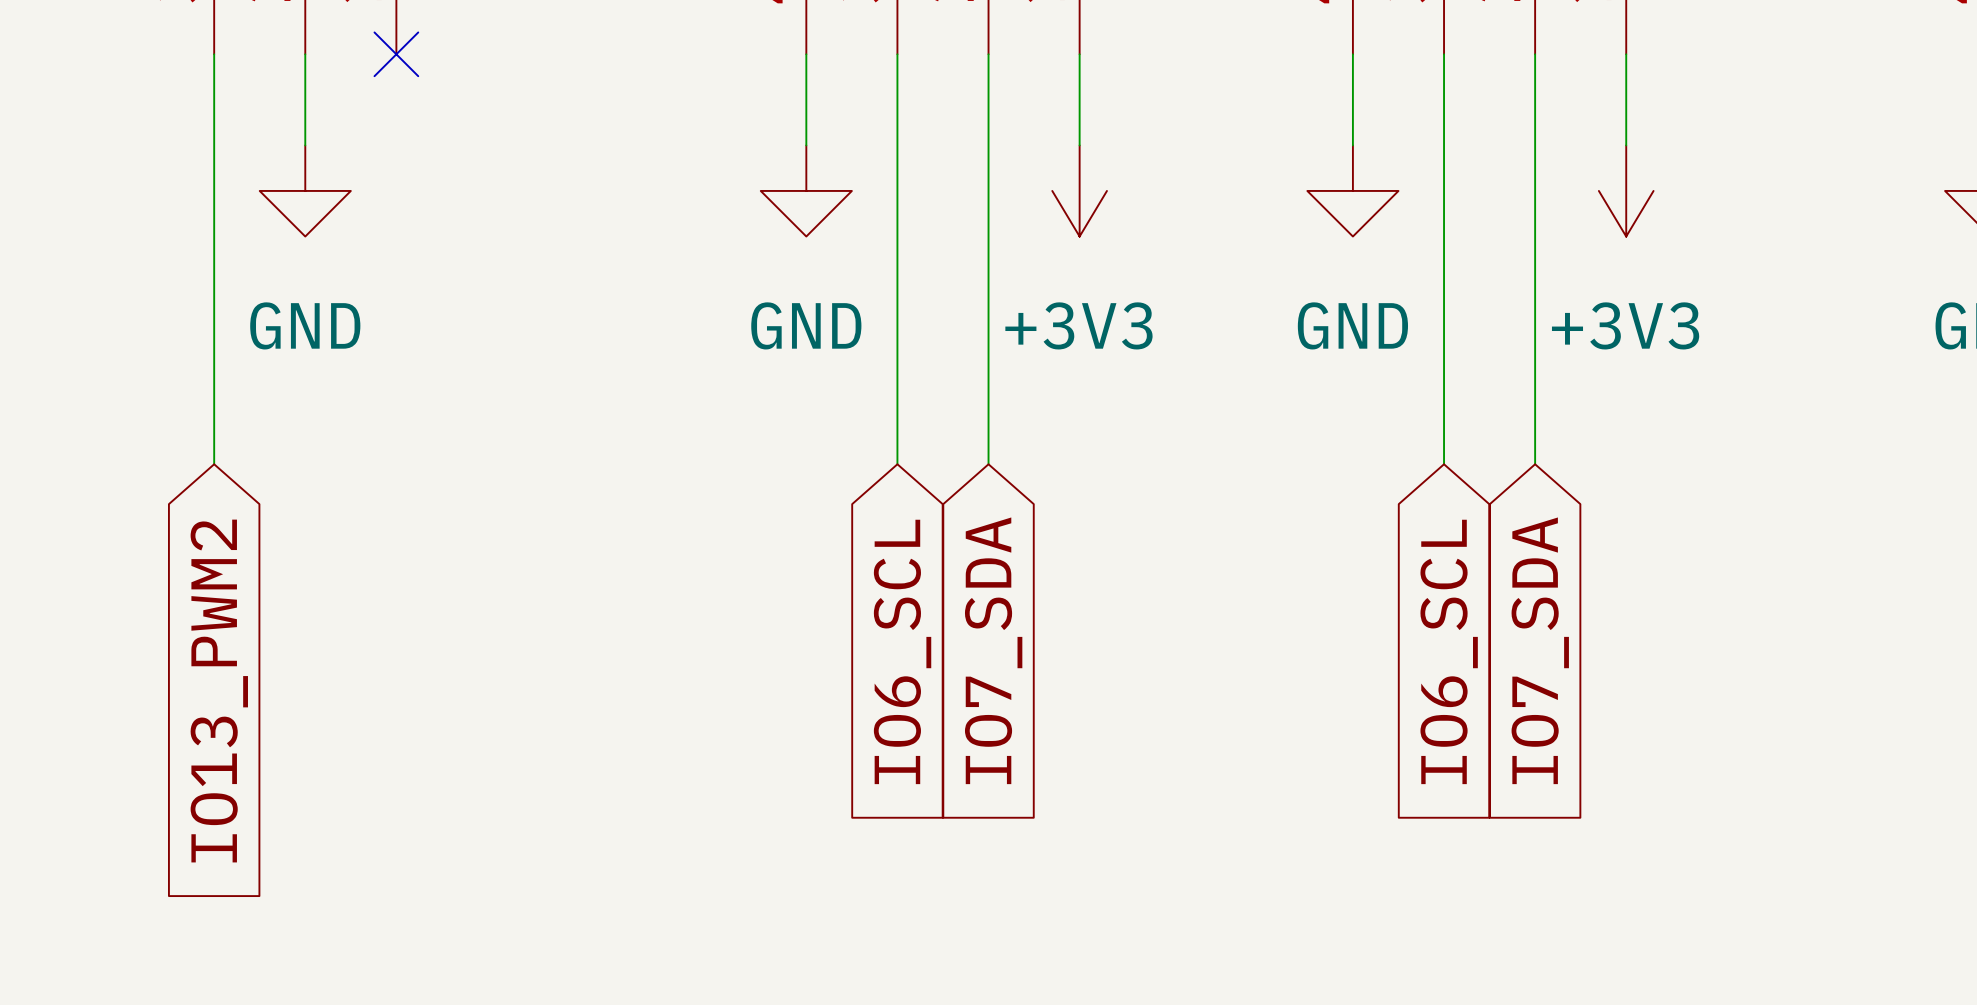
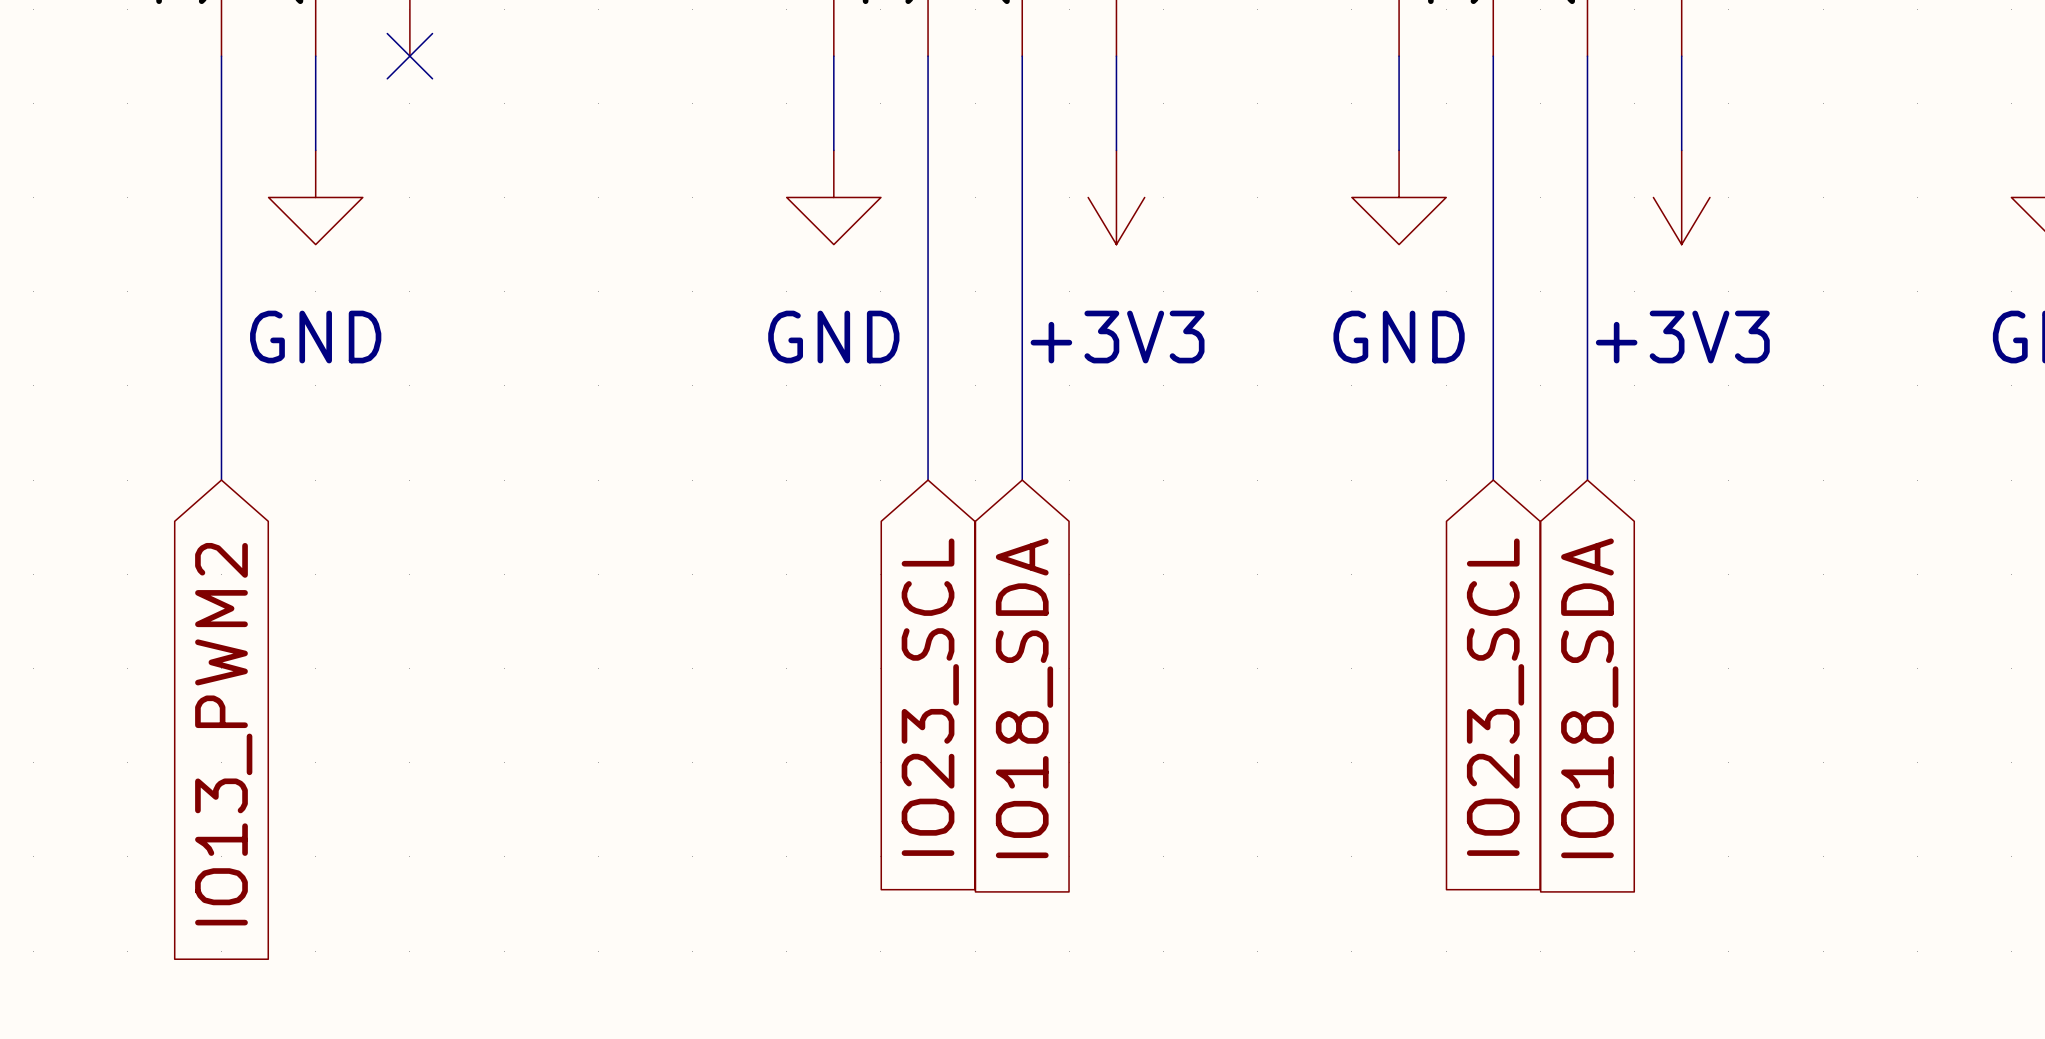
global label: IO7_SDA (993, 650) -> IO18_SDA (1024, 698)
global label: IO7_SDA (1540, 650) -> IO18_SDA (1589, 698)
global label: IO6_SCL (902, 651) -> IO23_SCL (930, 697)
global label: IO6_SCL (1449, 651) -> IO23_SCL (1495, 697)

